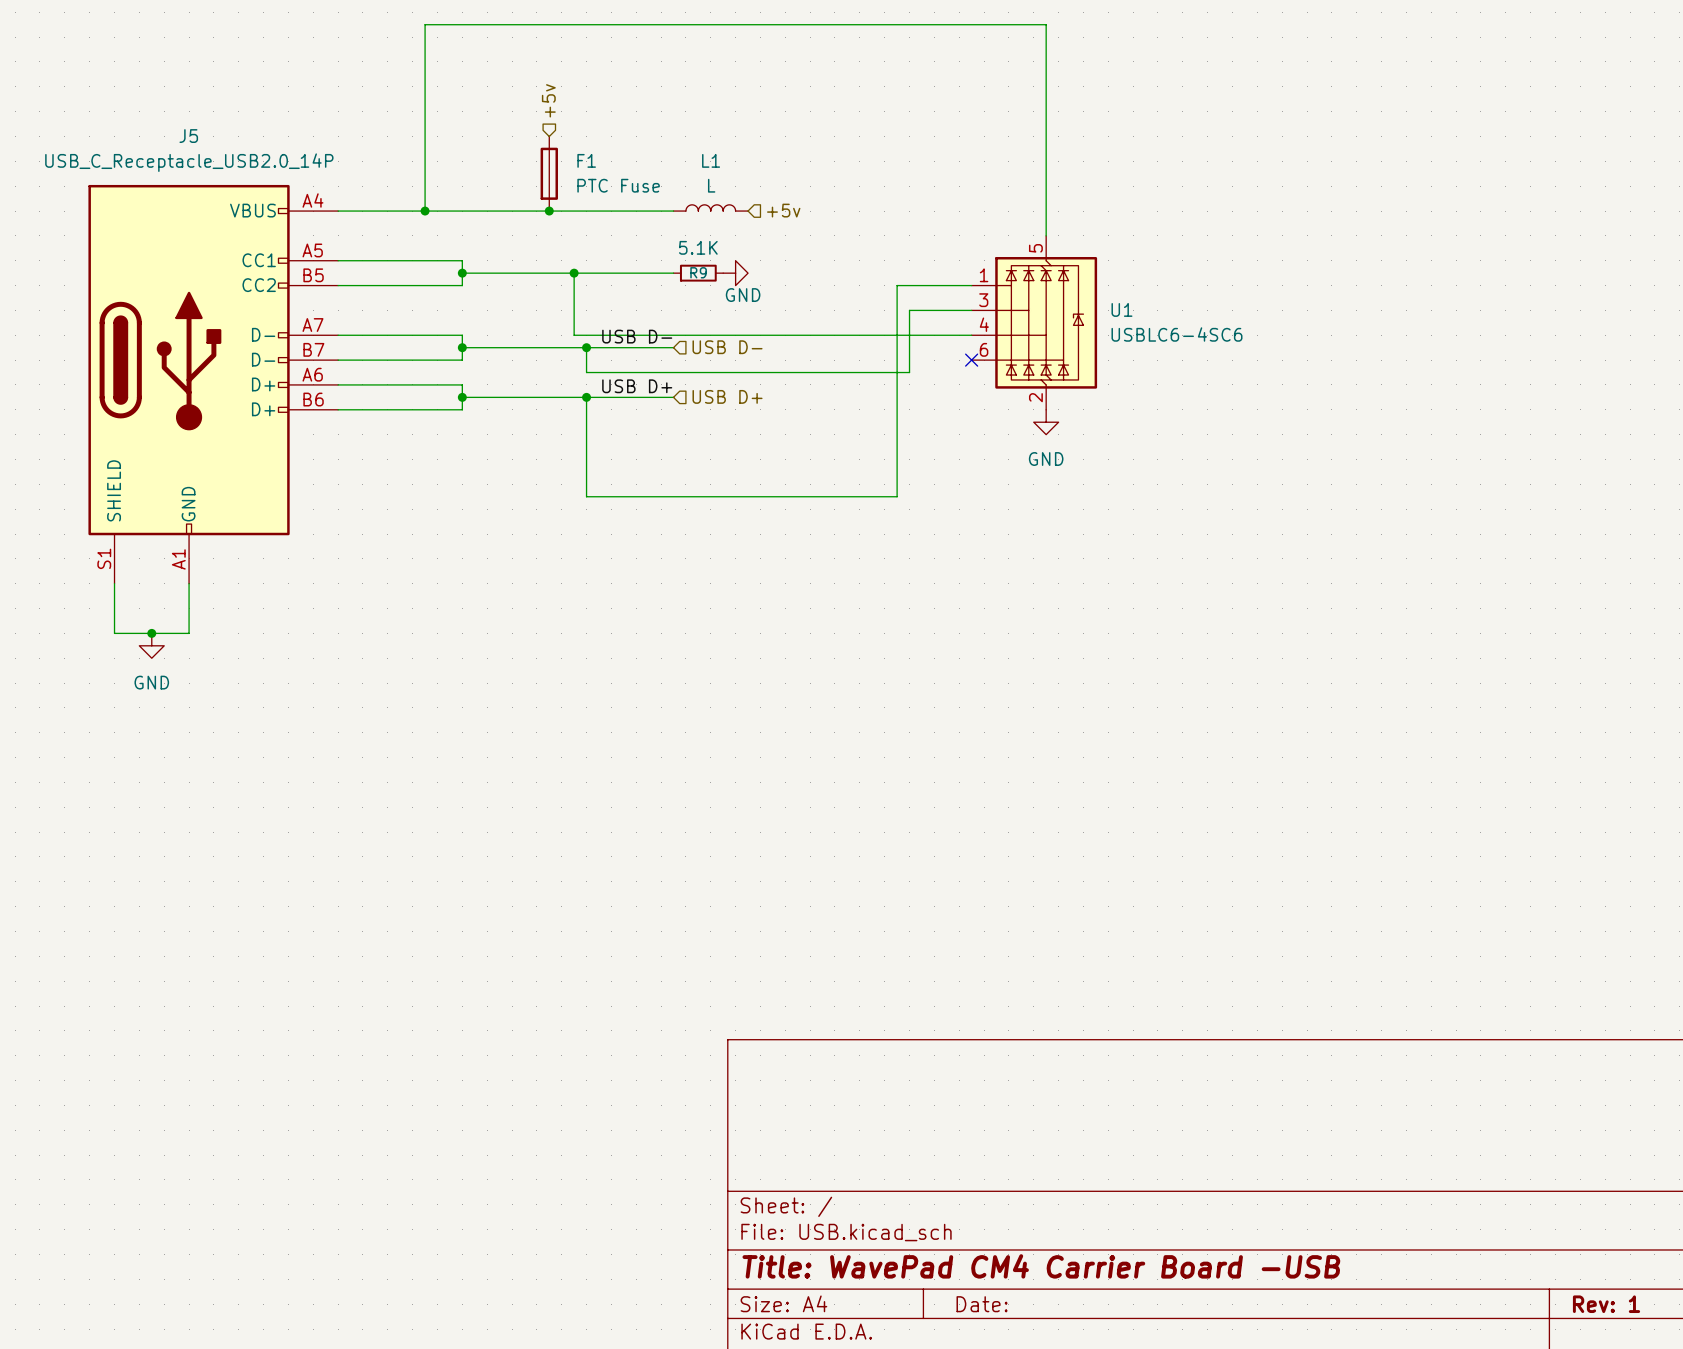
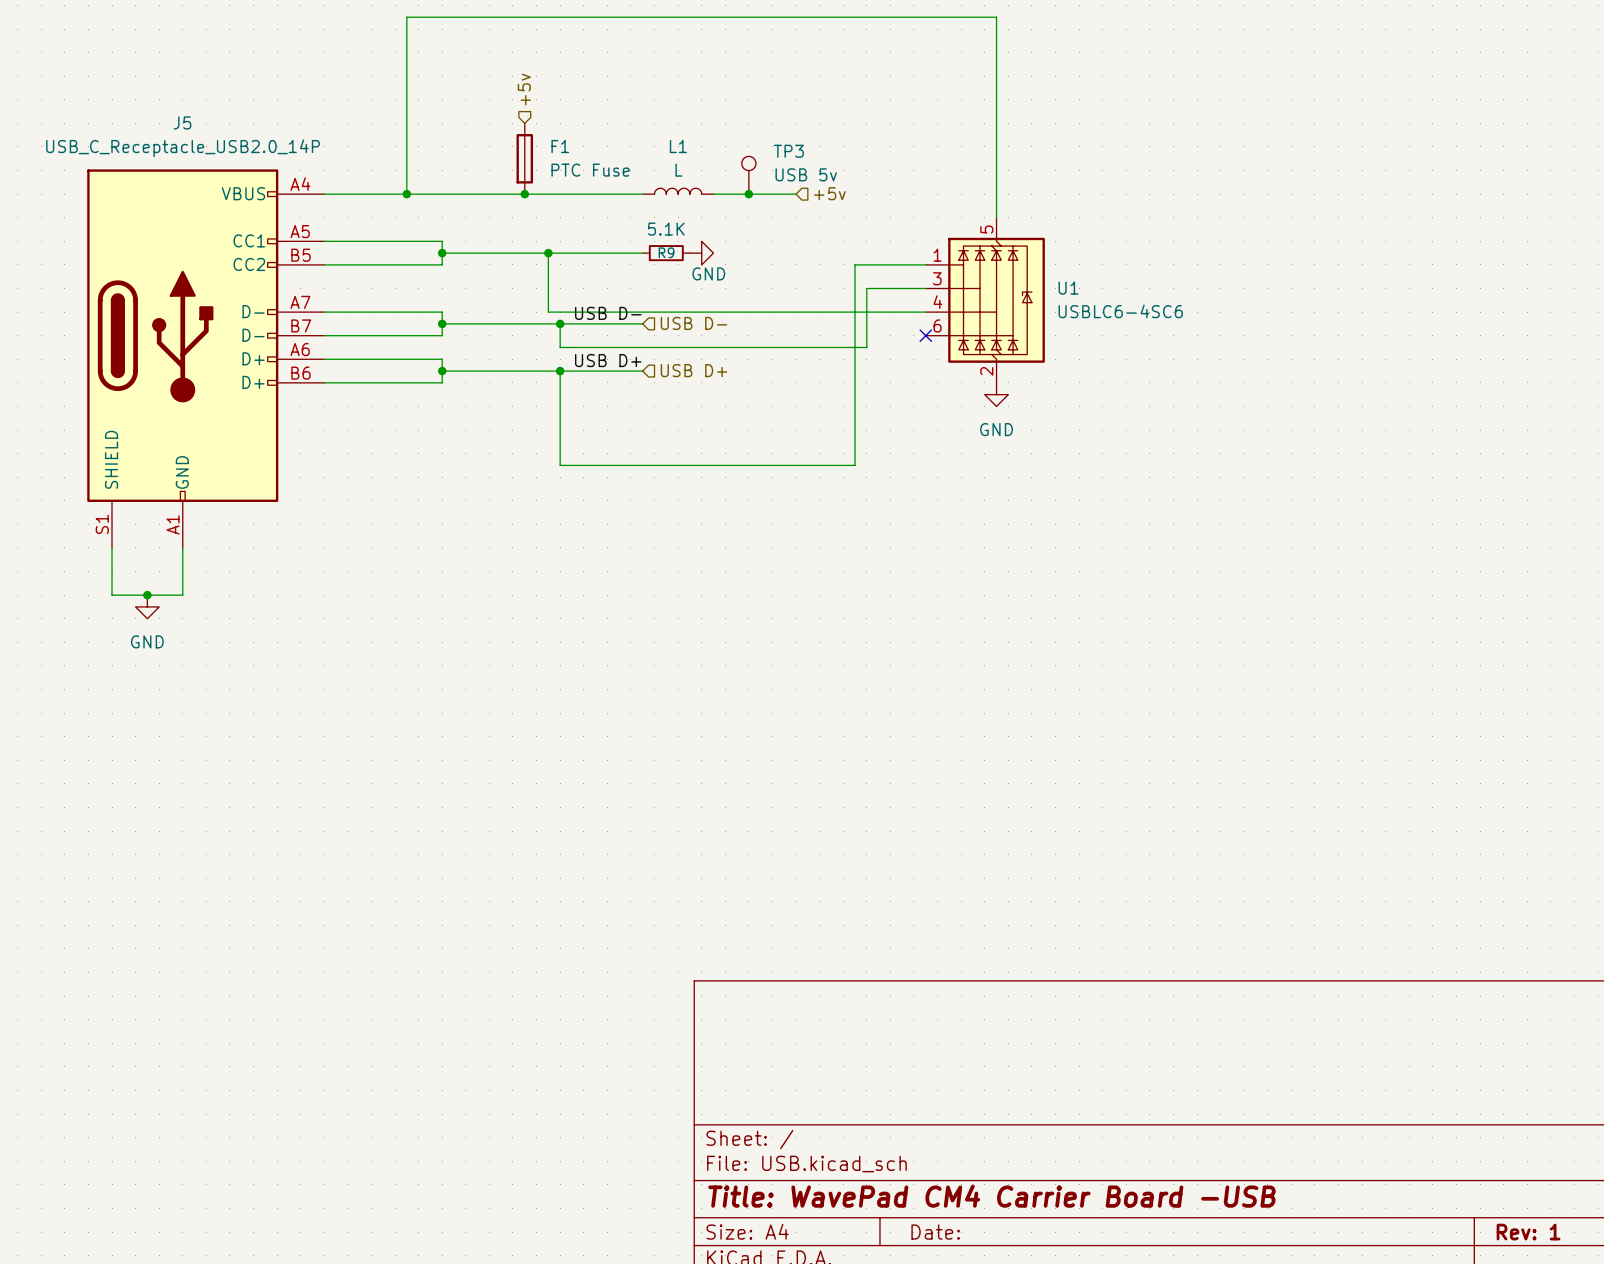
TP3: none -> USB 5v (748, 175)
hierarchical label position: +5v (783, 210) -> +5v (829, 193)
wire: none -> (713, 194) (796, 194)
junction: none -> (748, 194)

